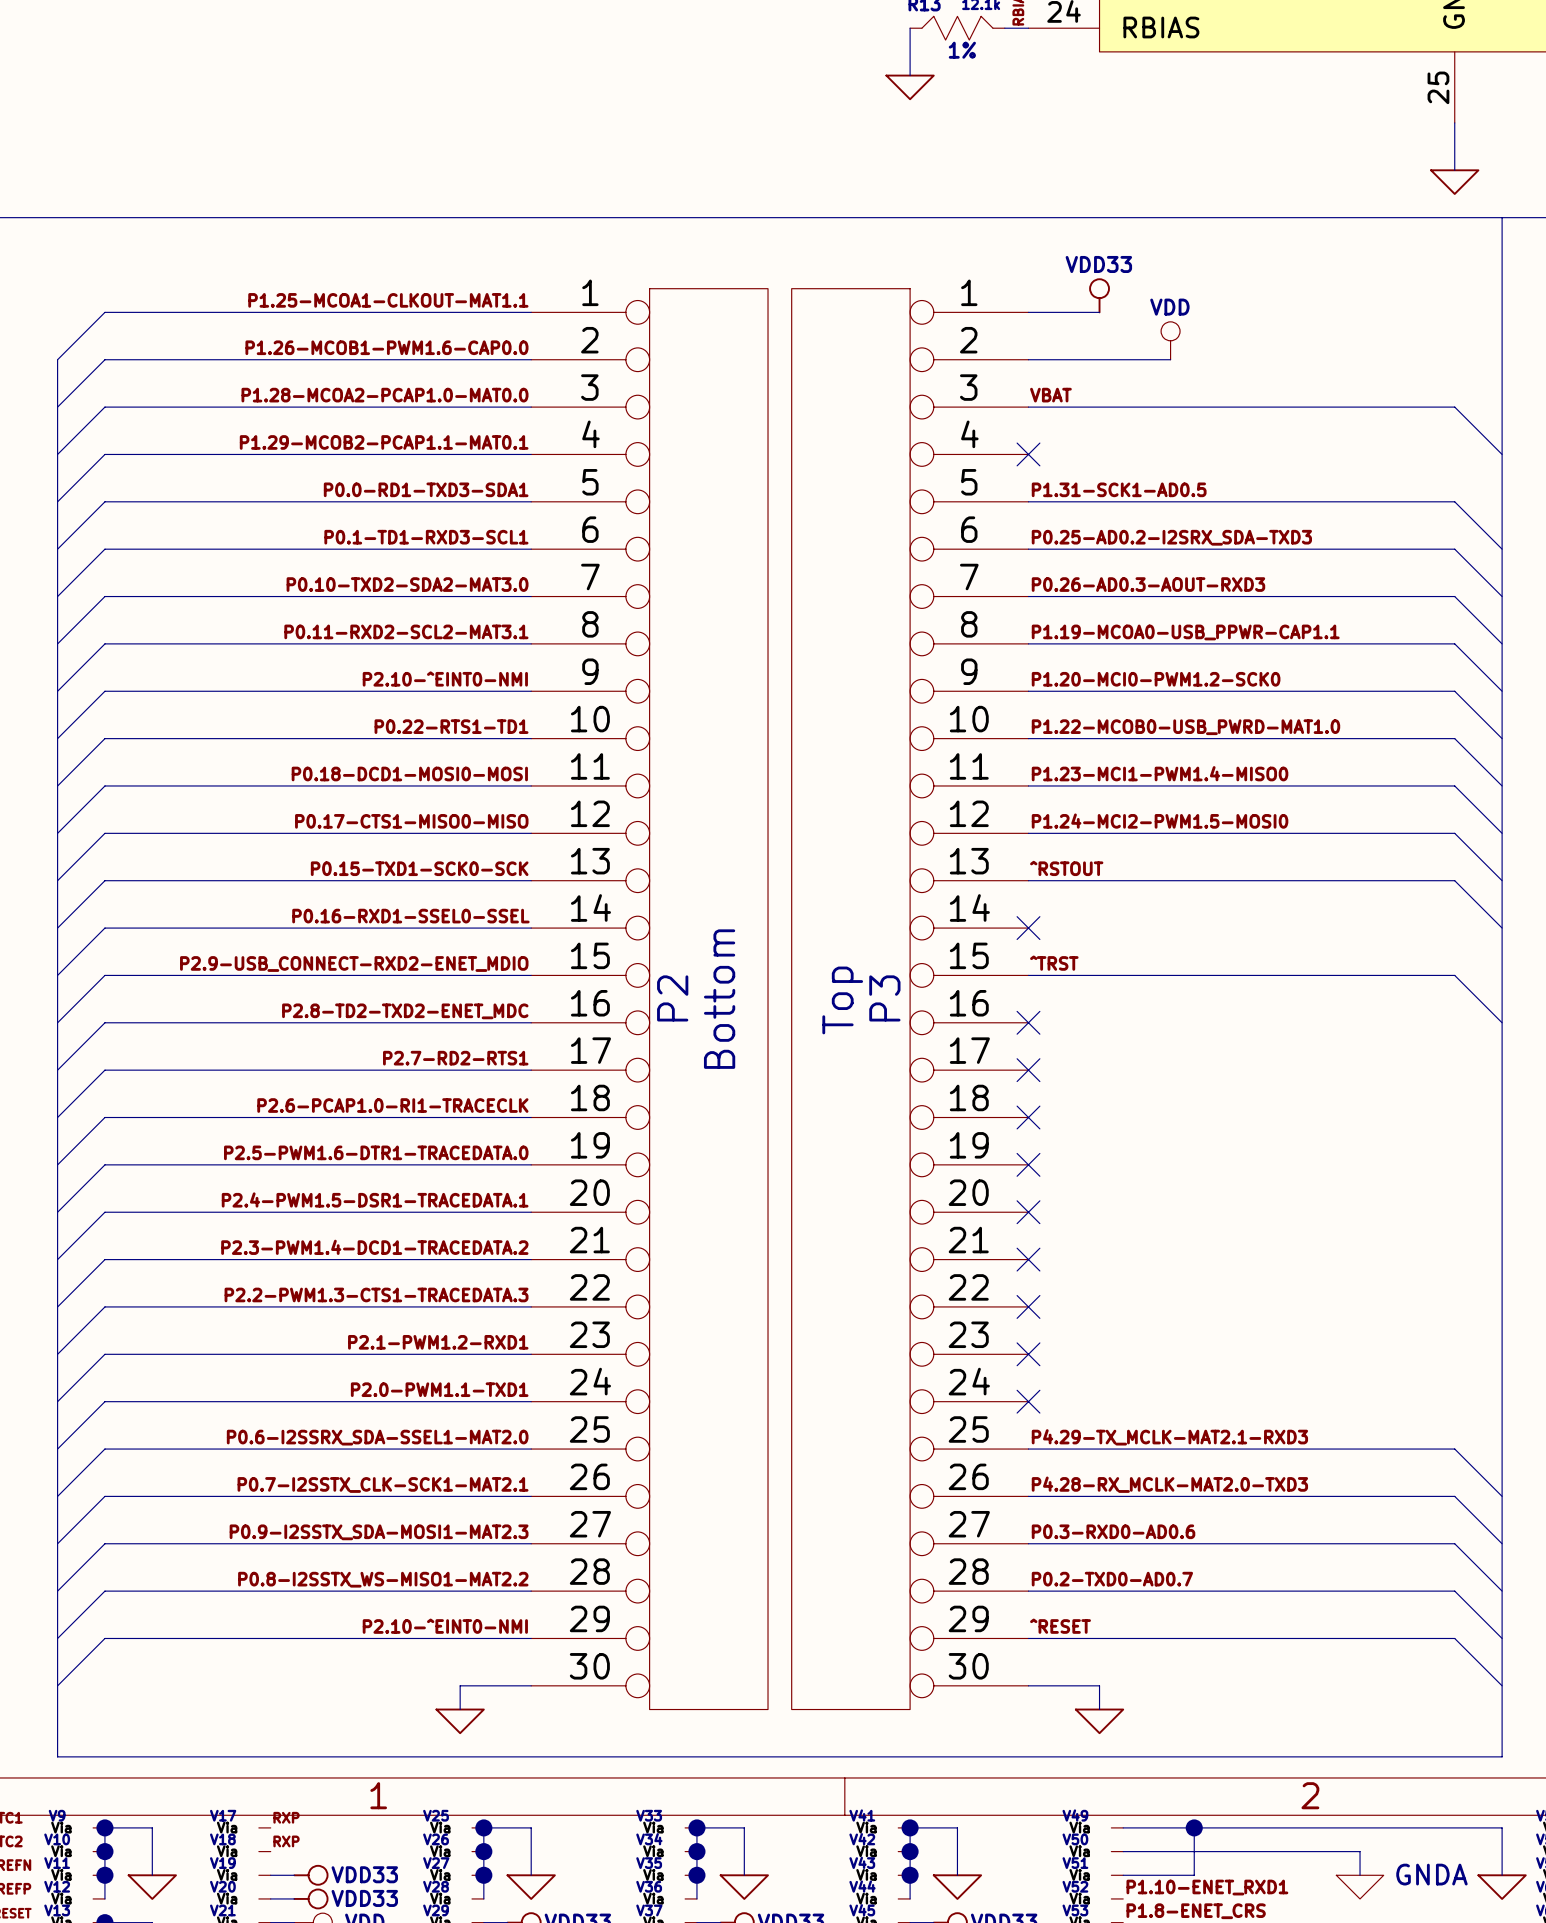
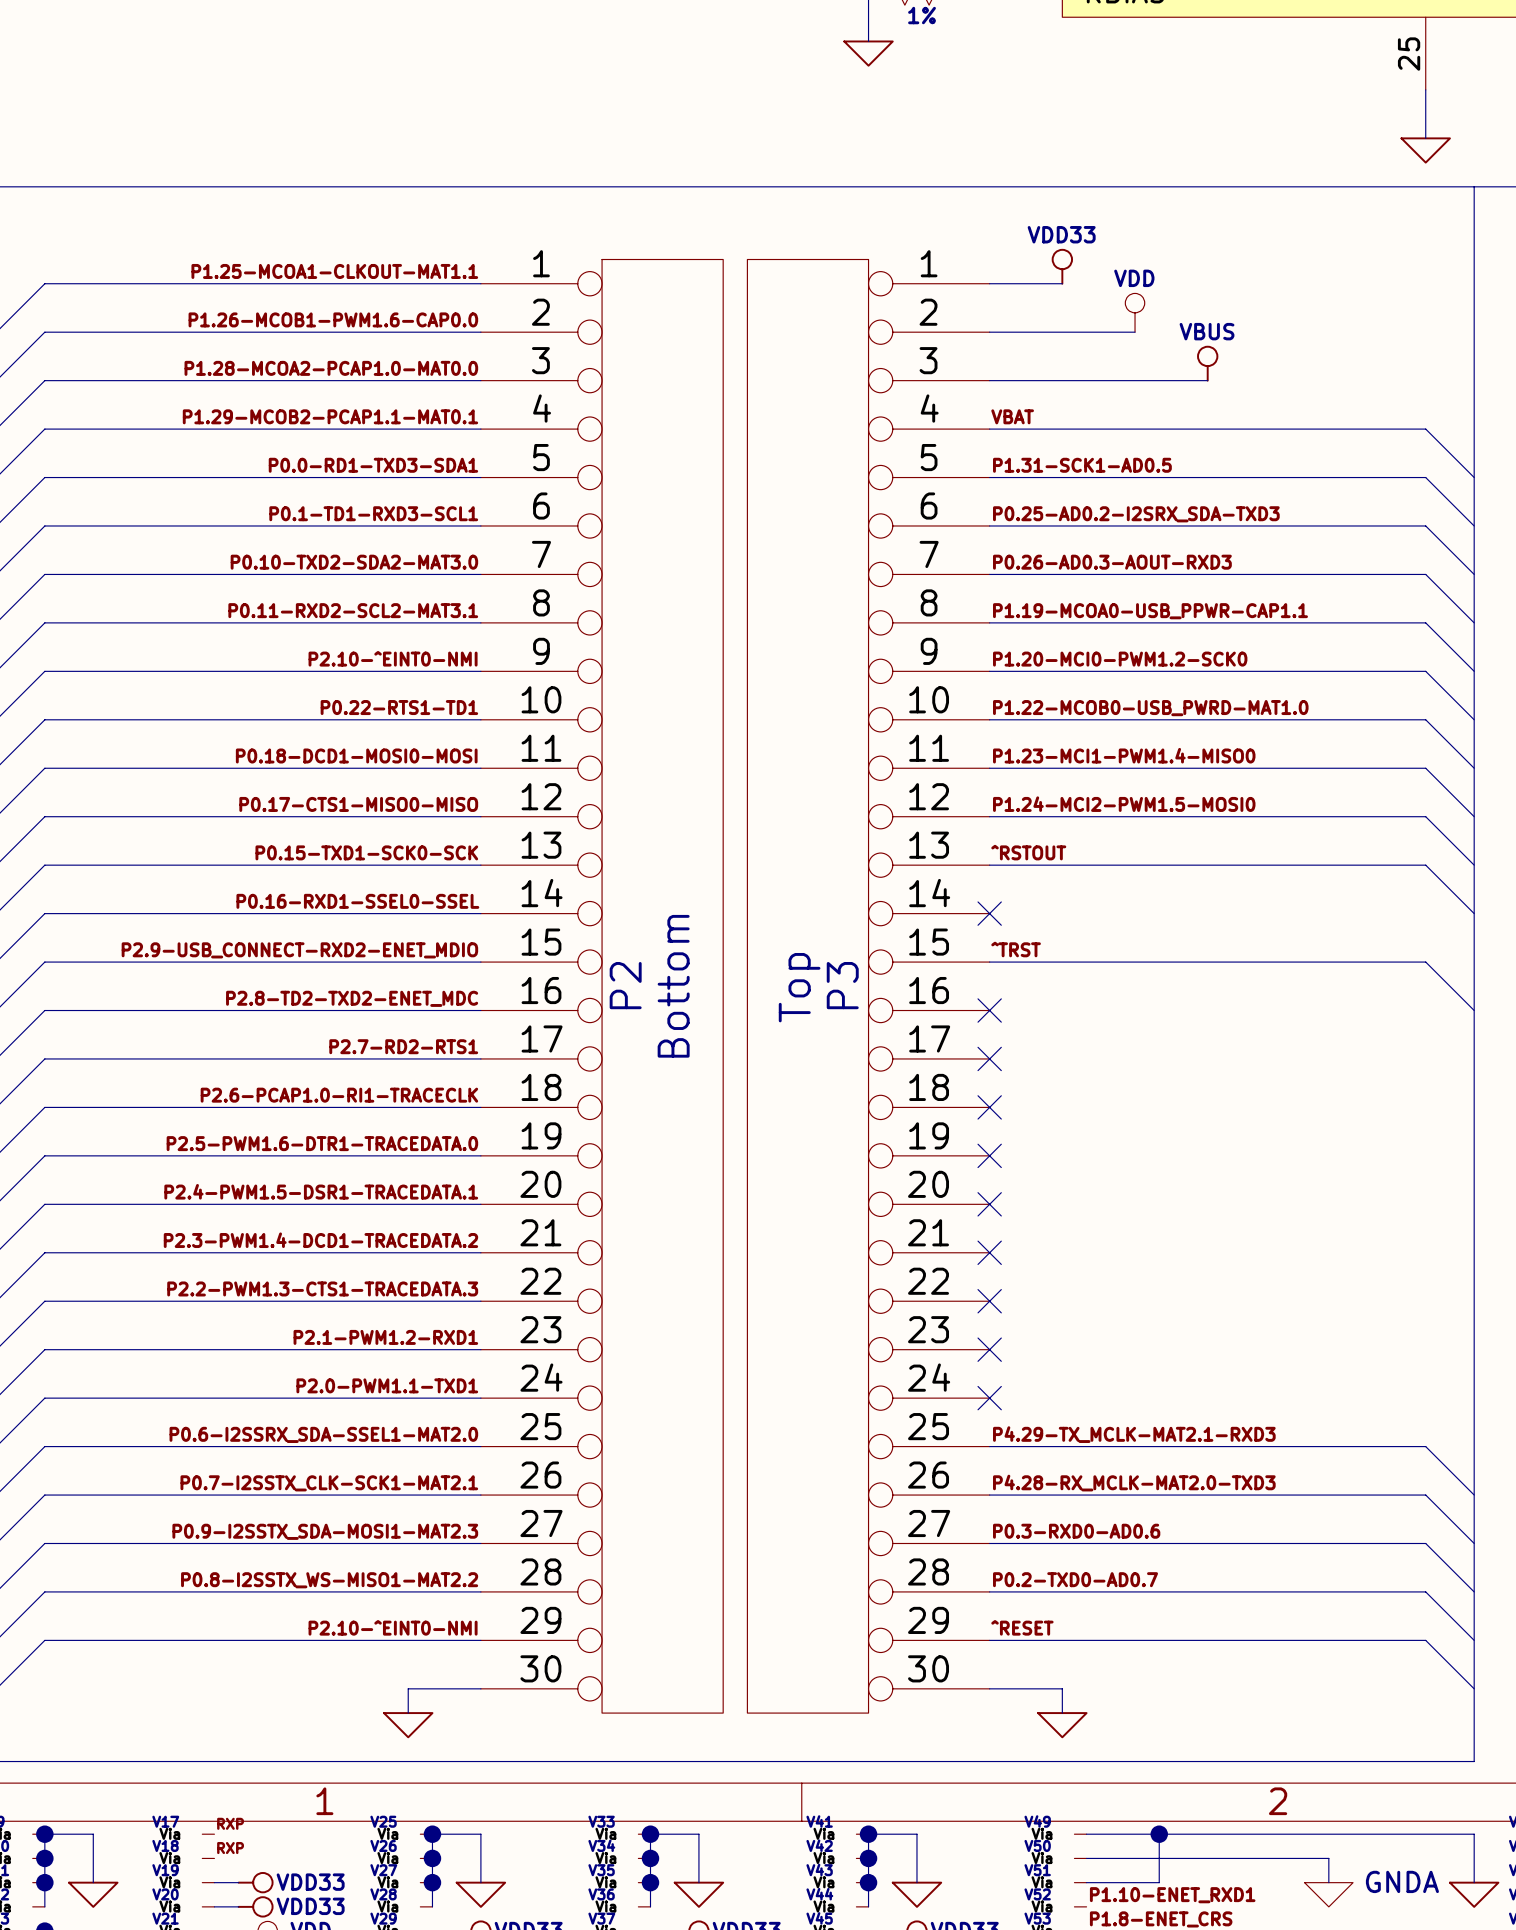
power symbol: none -> VBUS (1207, 363)
label position: VBAT (1050, 395) -> VBAT (1012, 416)
wire: (1241, 407) (1454, 407) (1502, 454) -> none
wire: none -> (989, 429) (1425, 429) (1474, 477)
no-connect mark: (1028, 454) -> none

